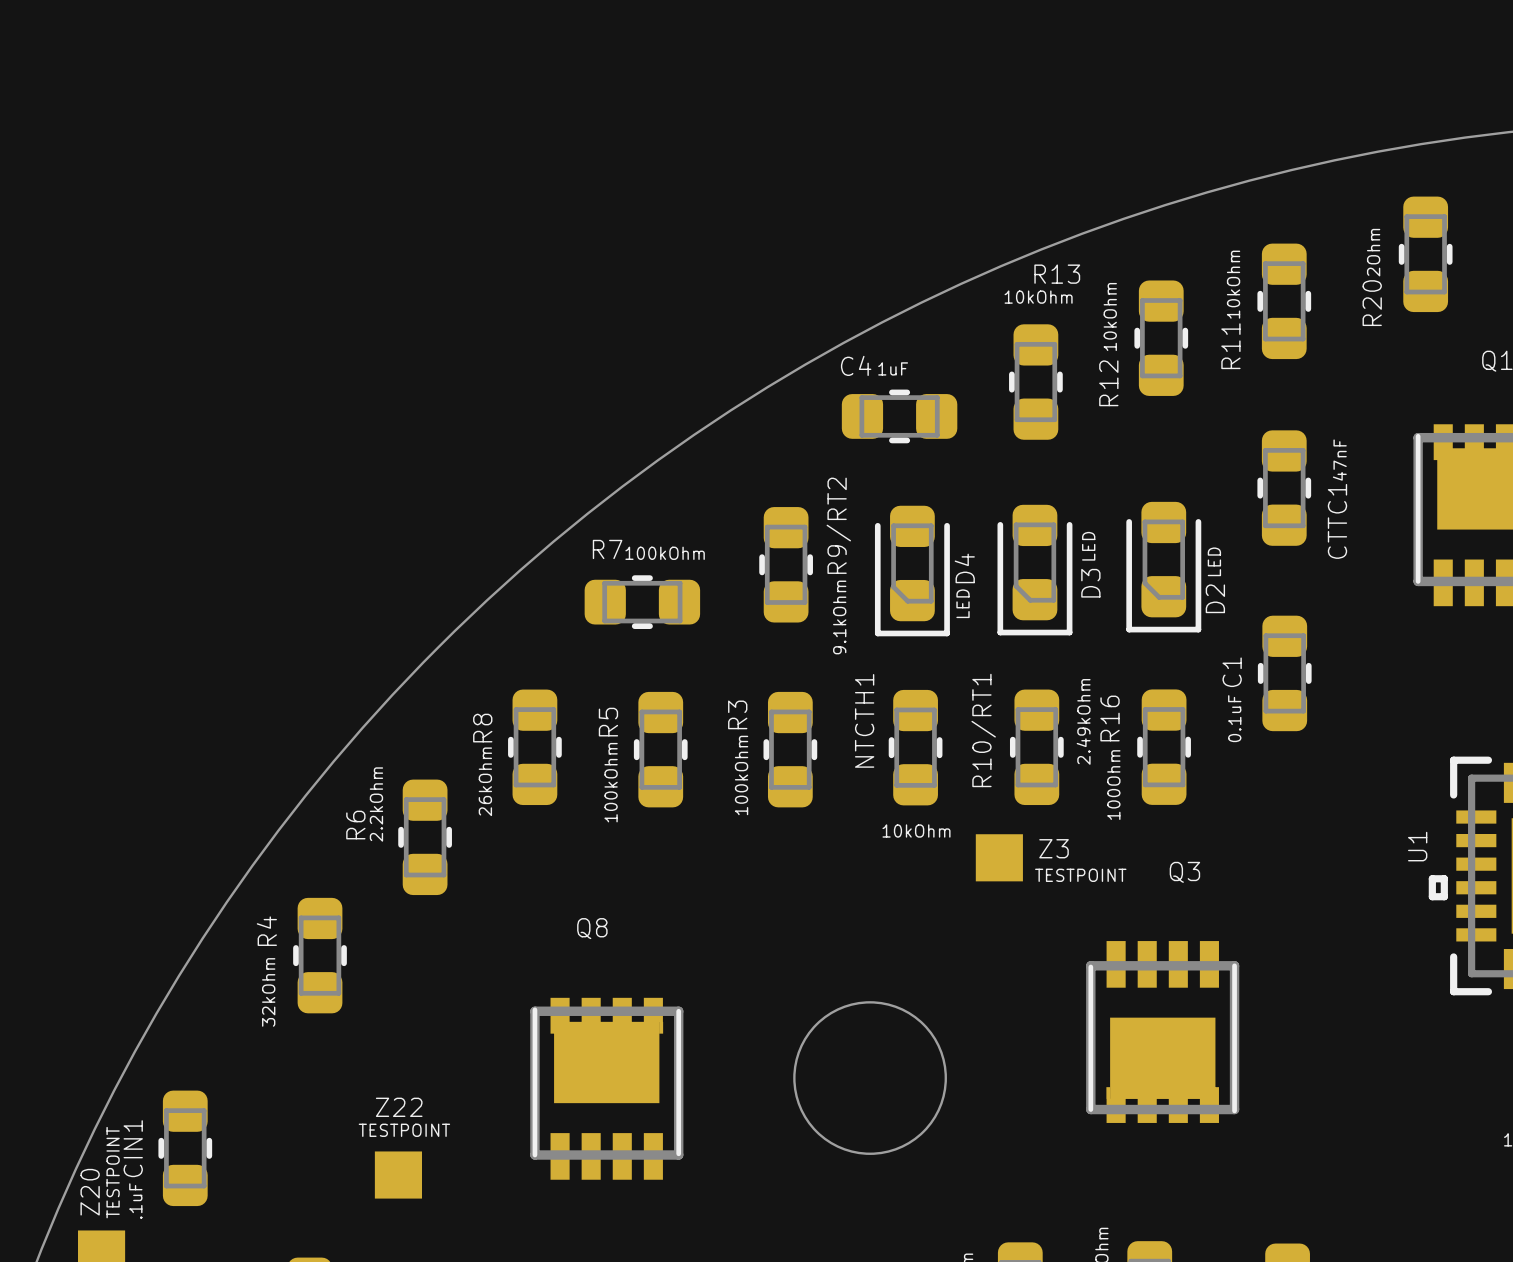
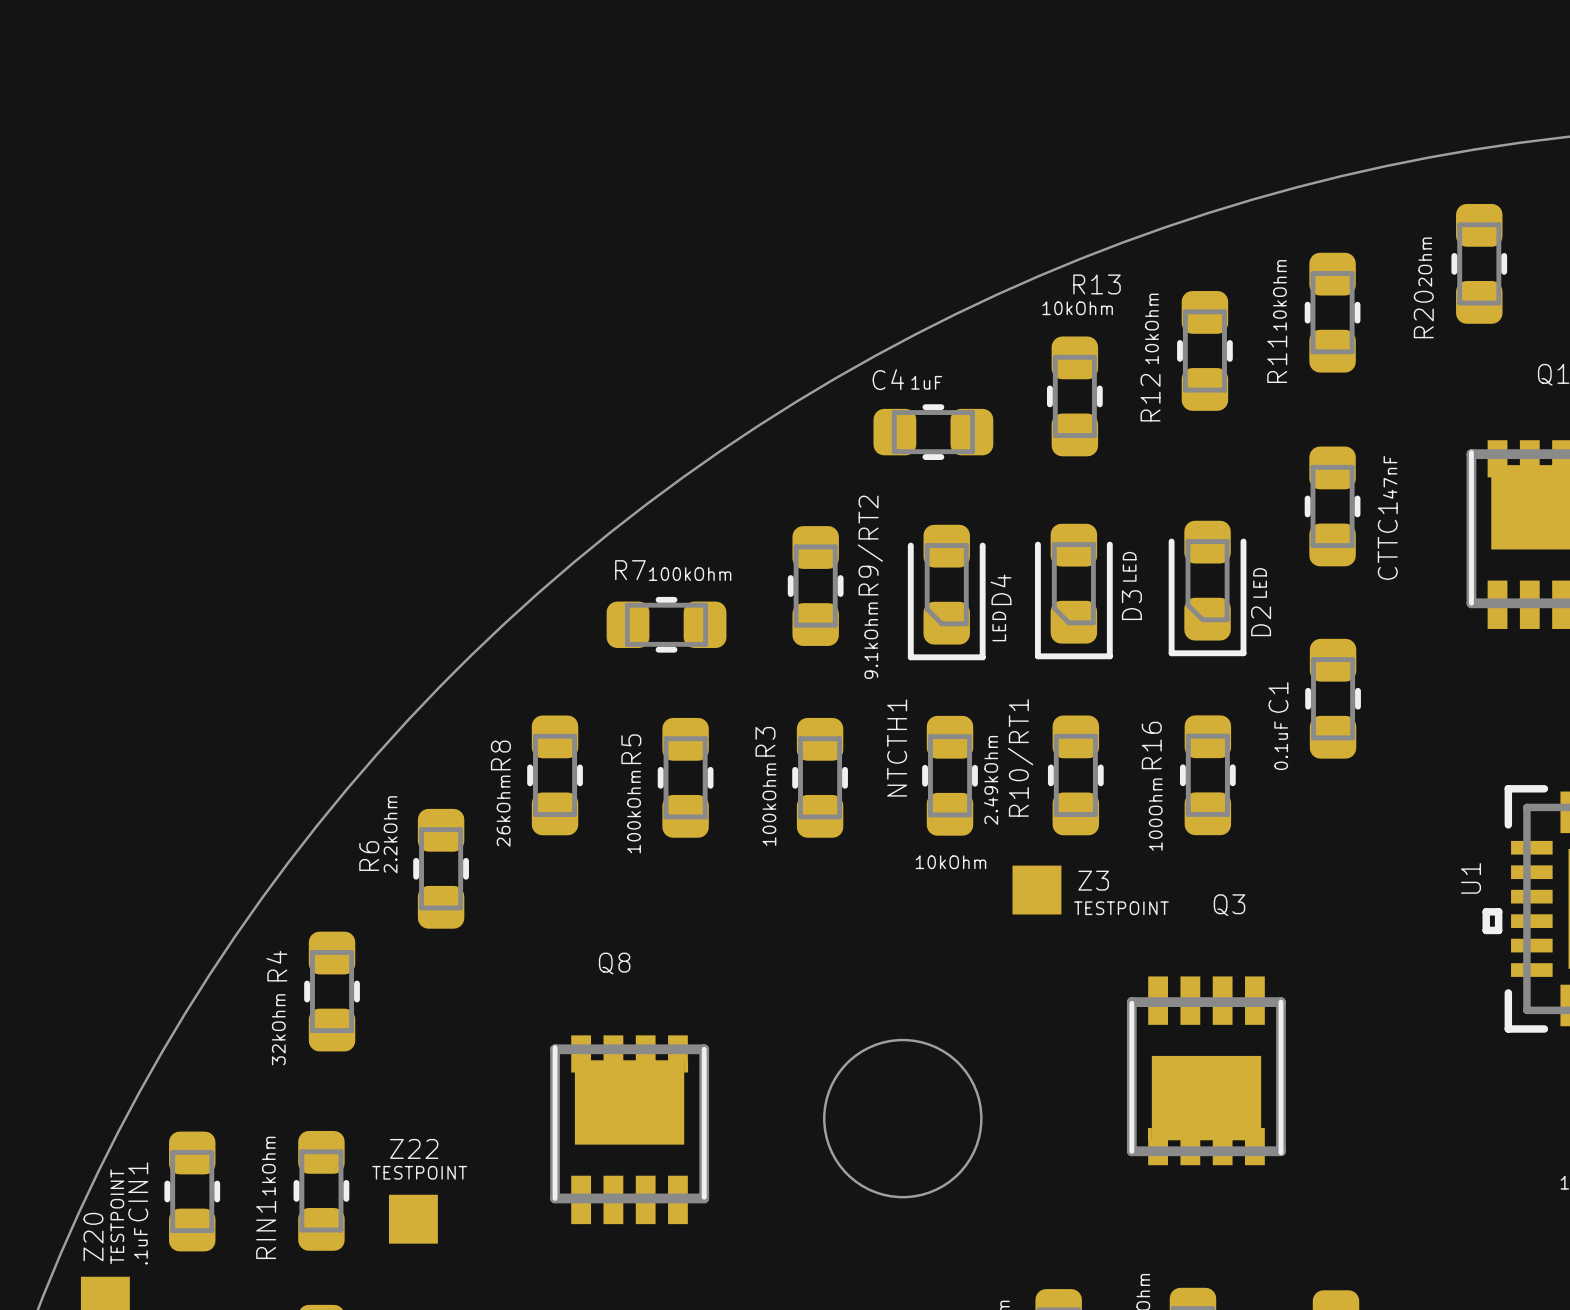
R10/RT1 value position: 2.49kOhm (1083, 721) -> 2.49kOhm (990, 780)
RIN1: none -> 1kOhm (321, 1190)

